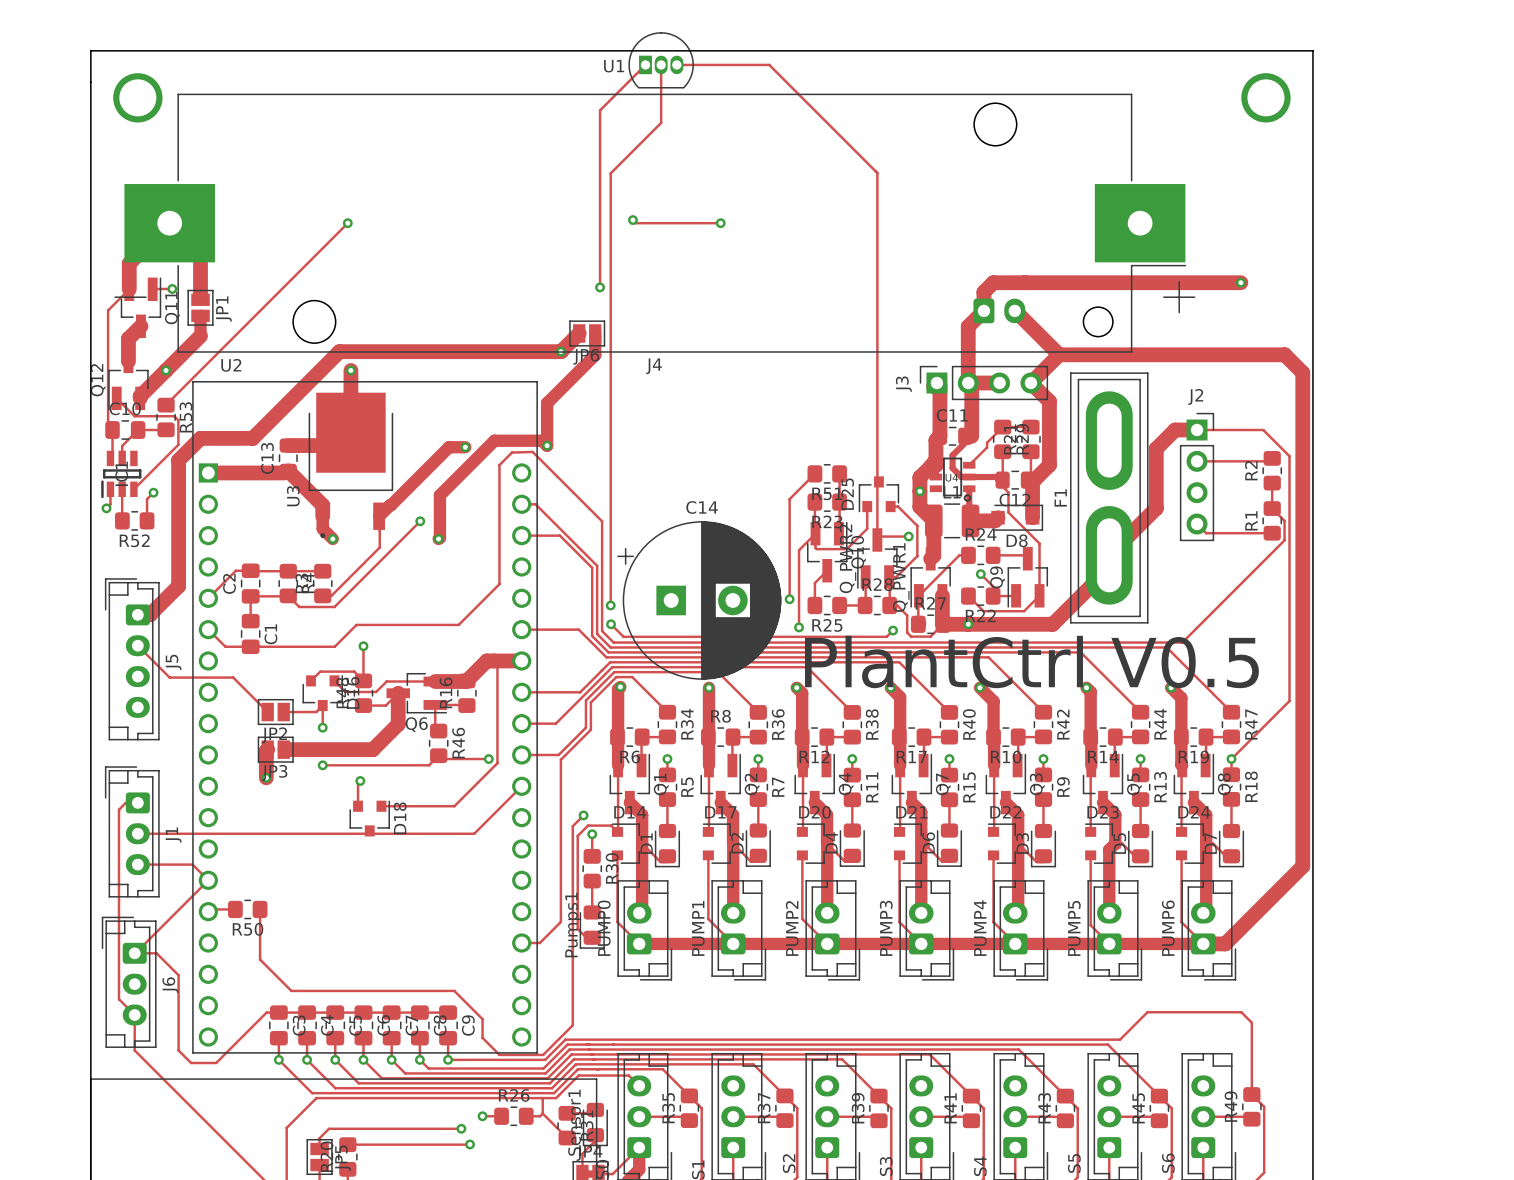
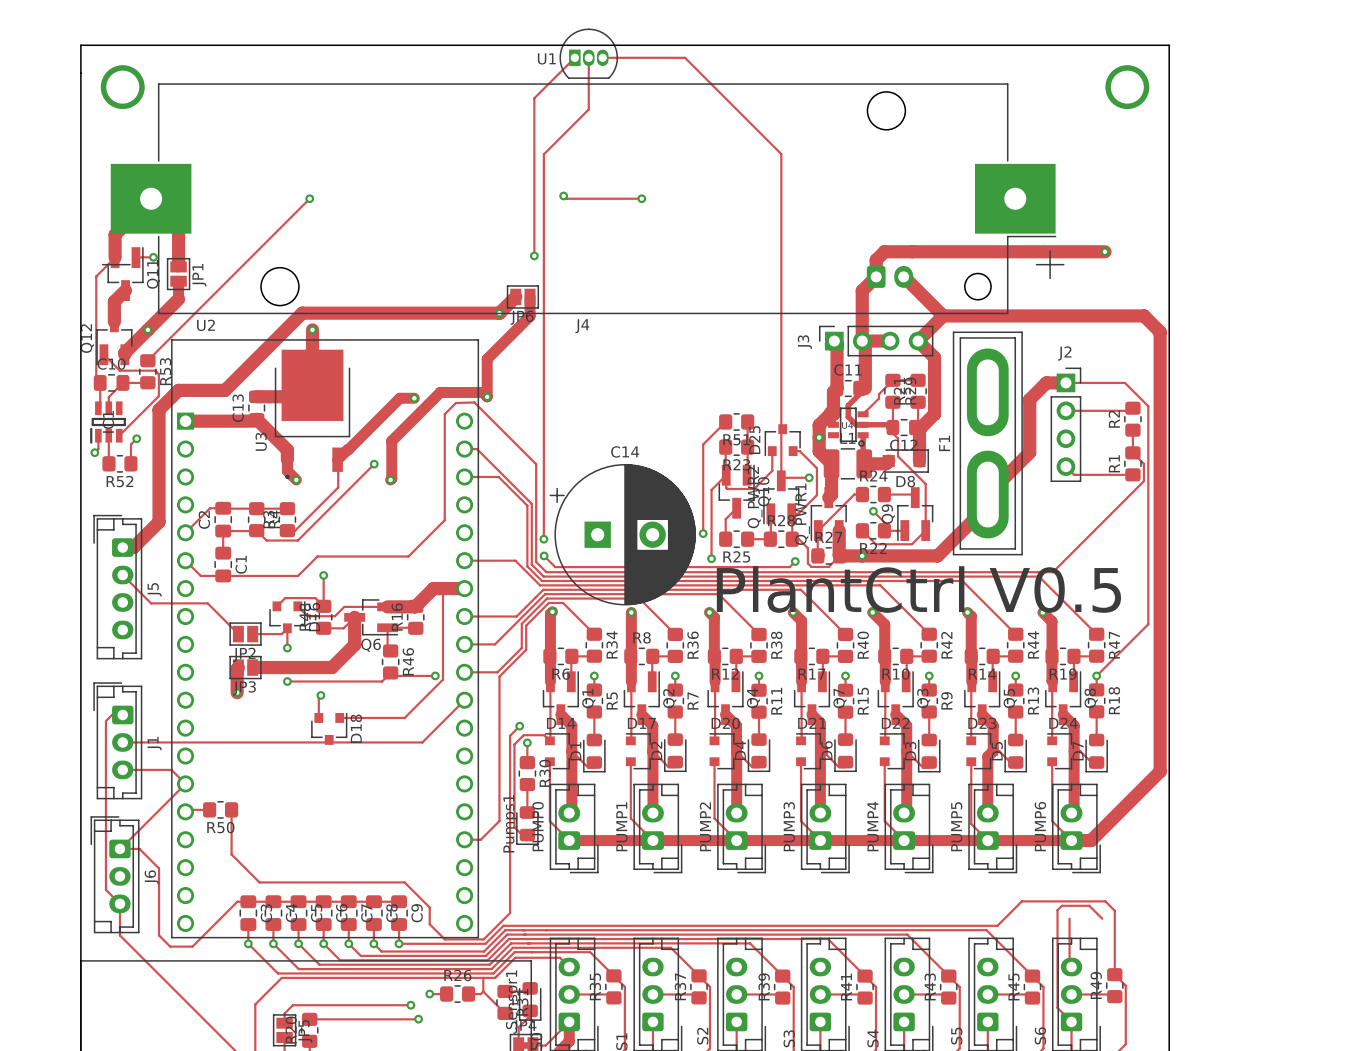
track: none -> (1069, 918) (1069, 965)
track: none -> (1102, 918) (1089, 905) (1061, 905) (1057, 910) (1057, 1007) (1071, 1021)

